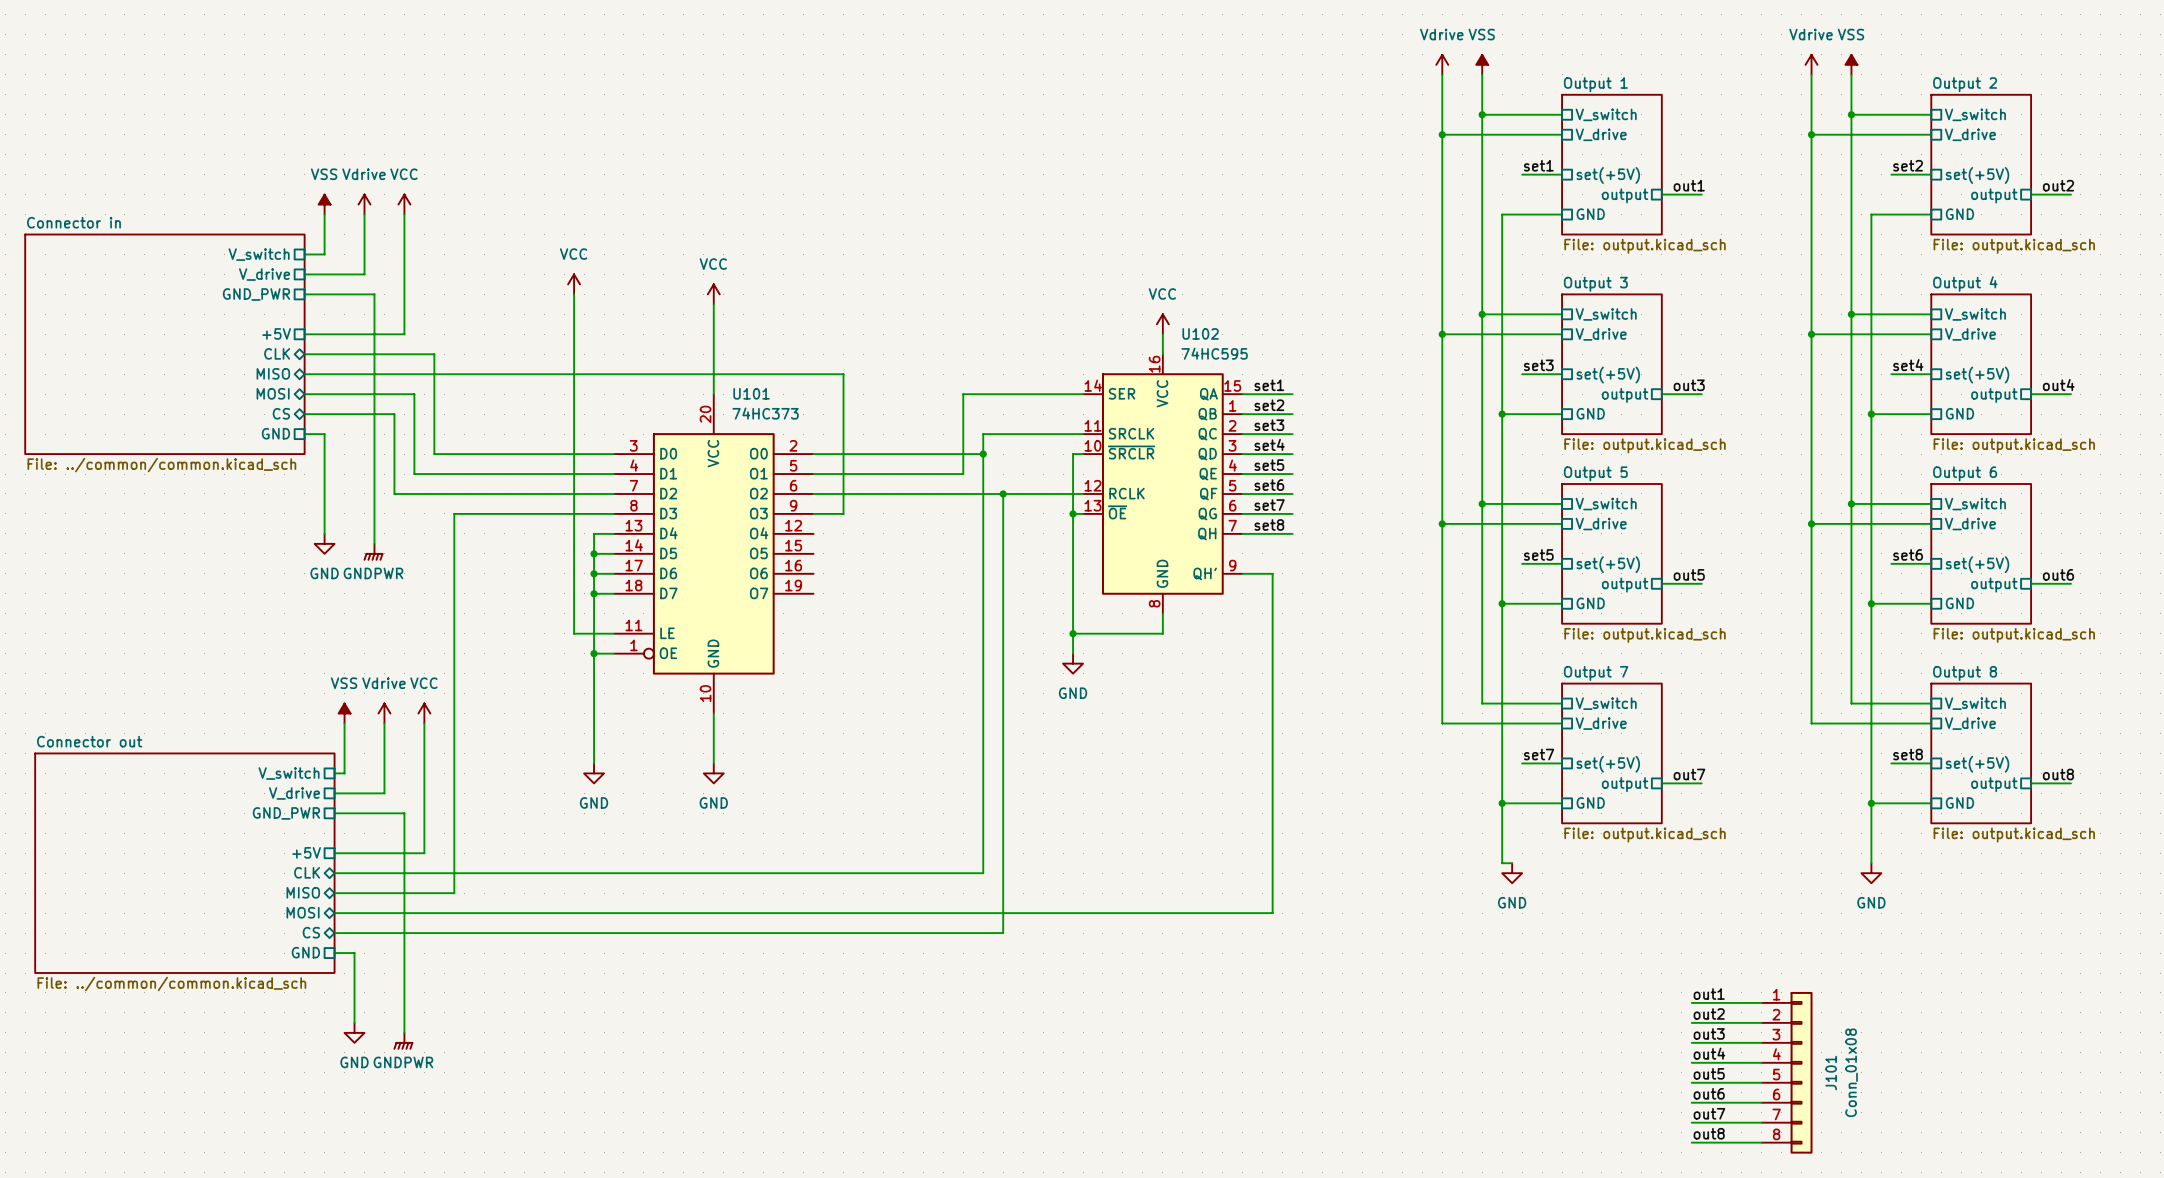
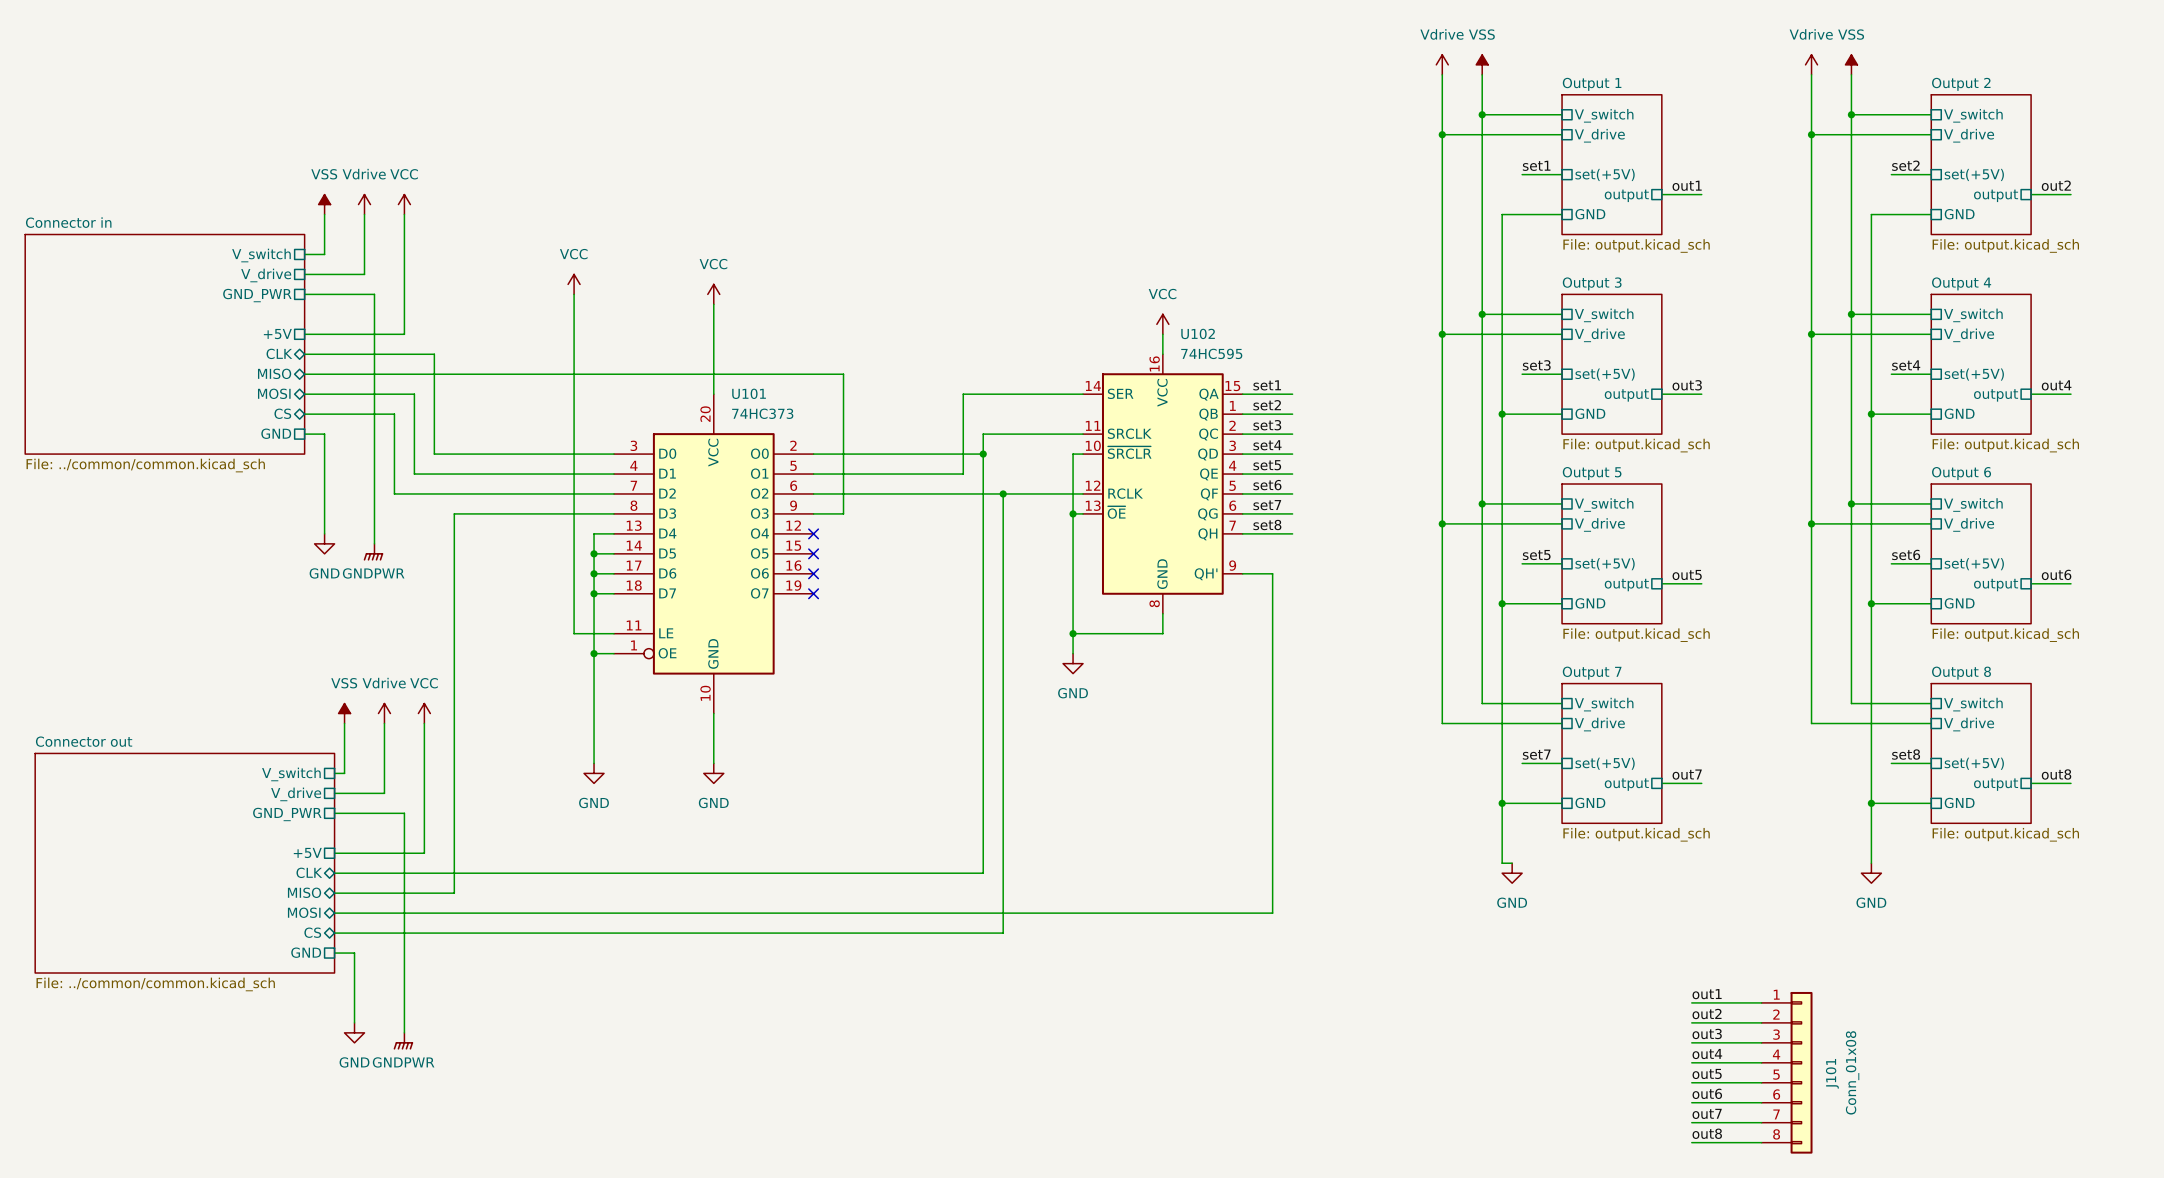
no-connect mark: none -> (813, 533)
no-connect mark: none -> (813, 553)
no-connect mark: none -> (813, 573)
no-connect mark: none -> (813, 593)

